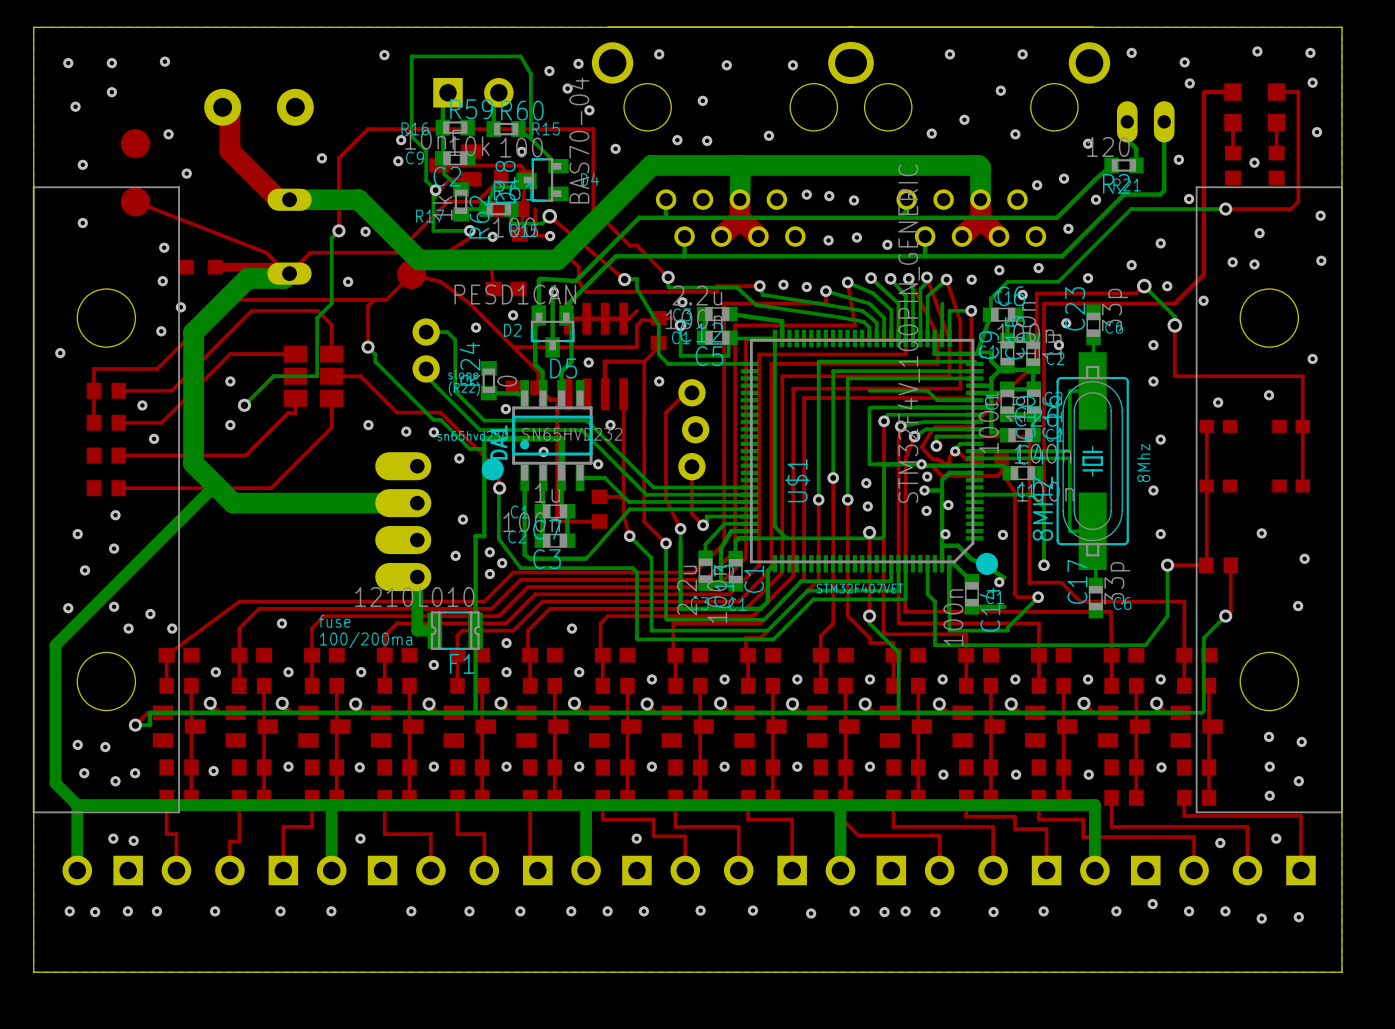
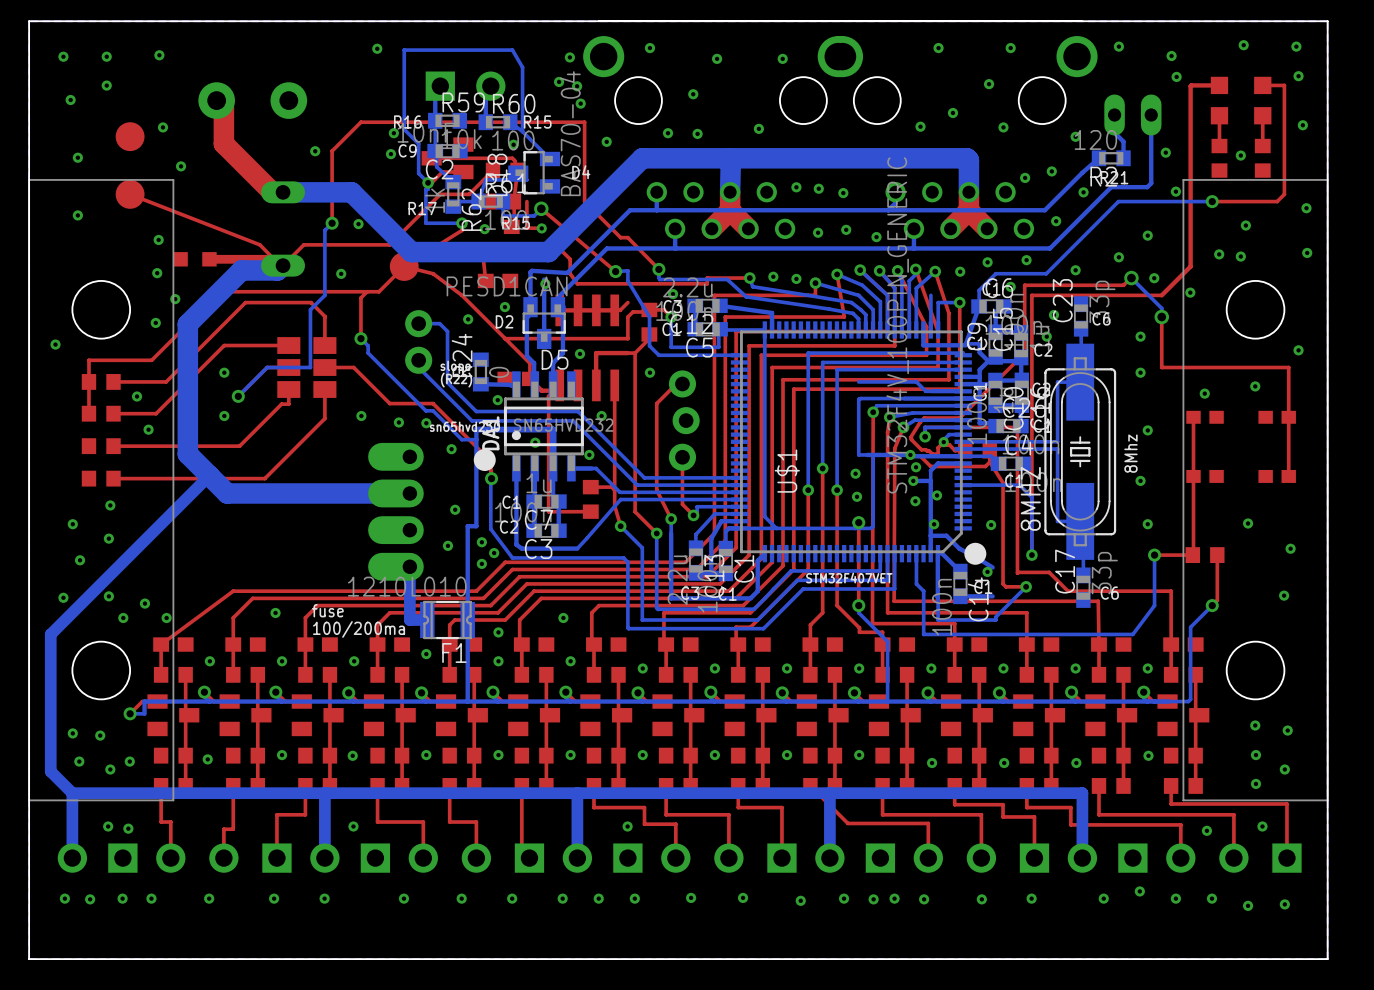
via position: (549, 71) -> (577, 86)

